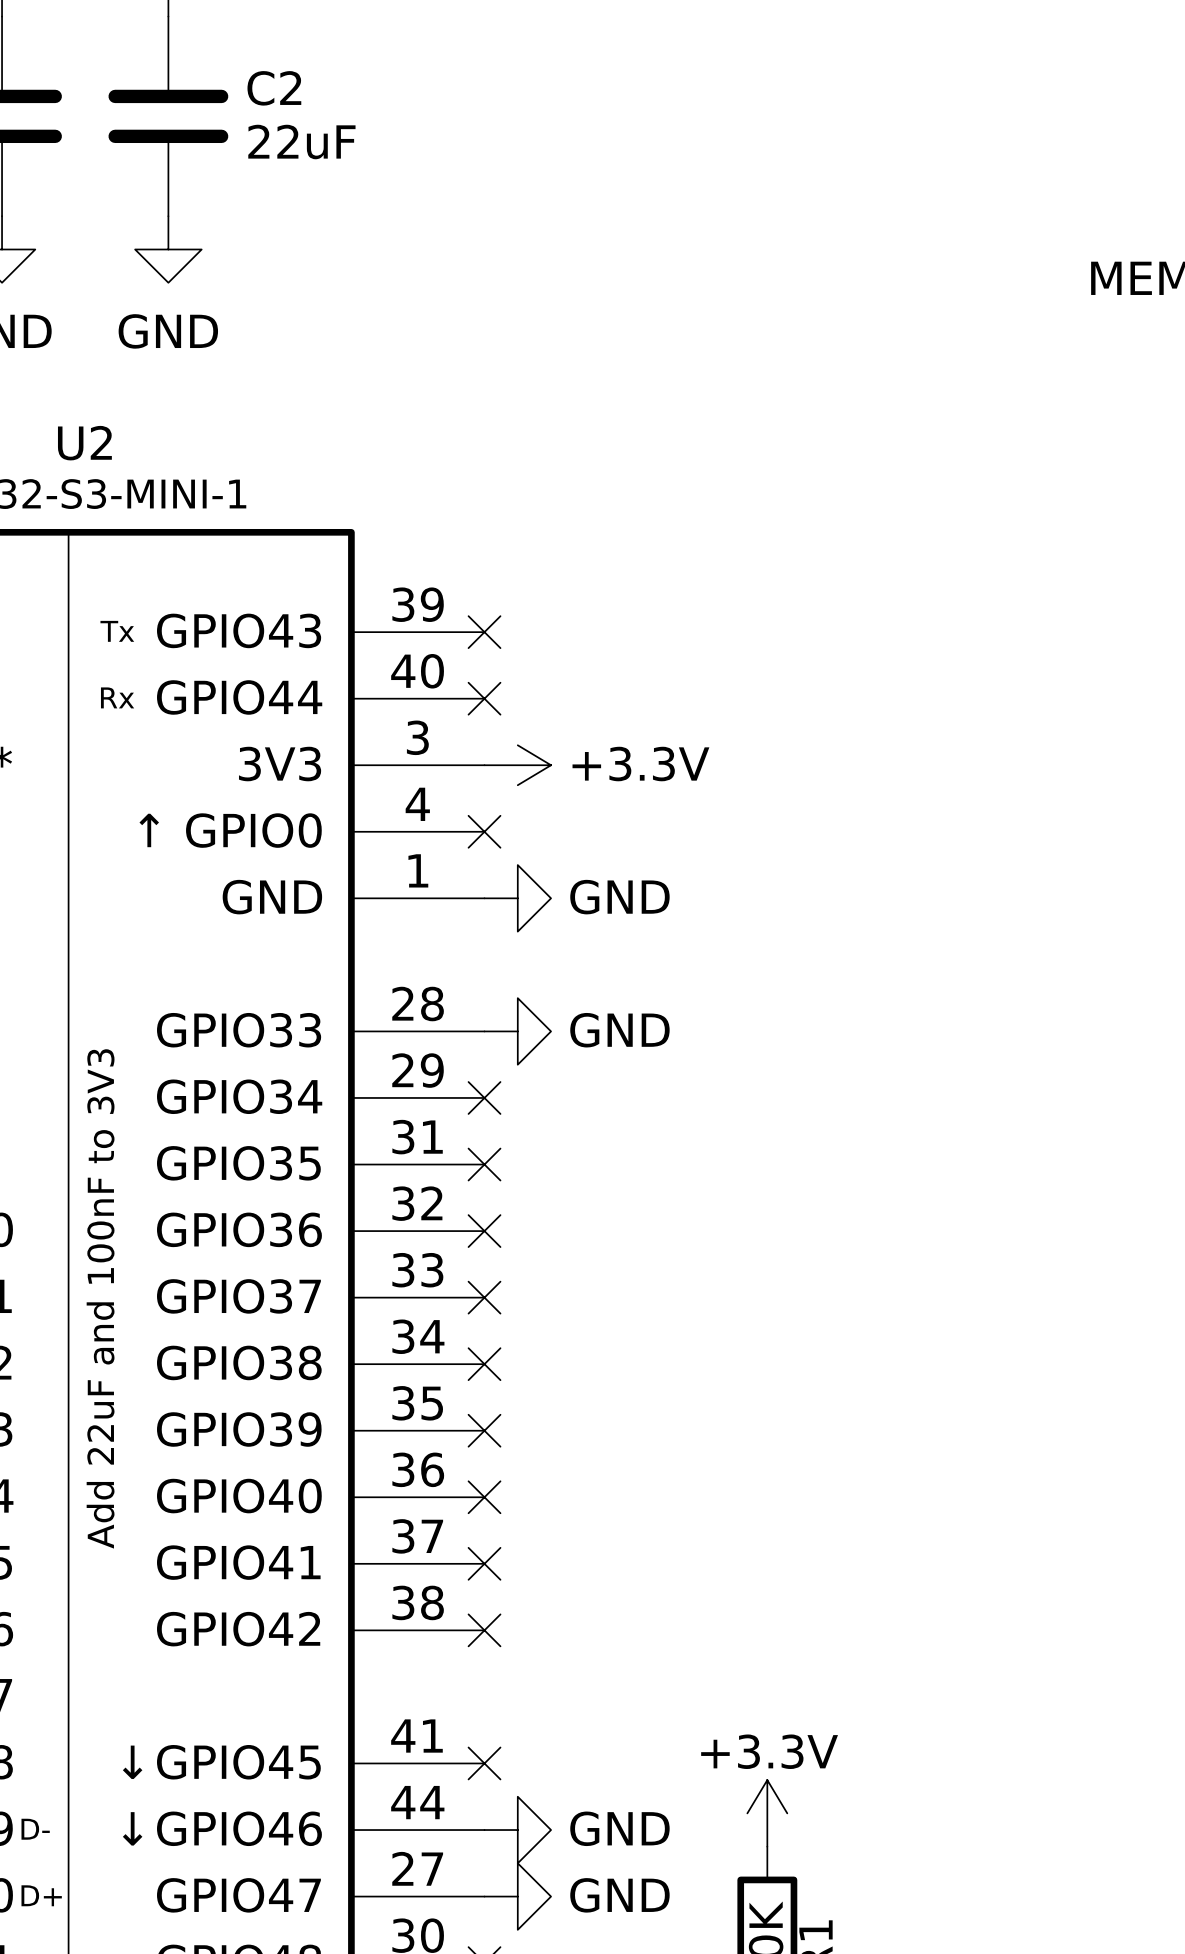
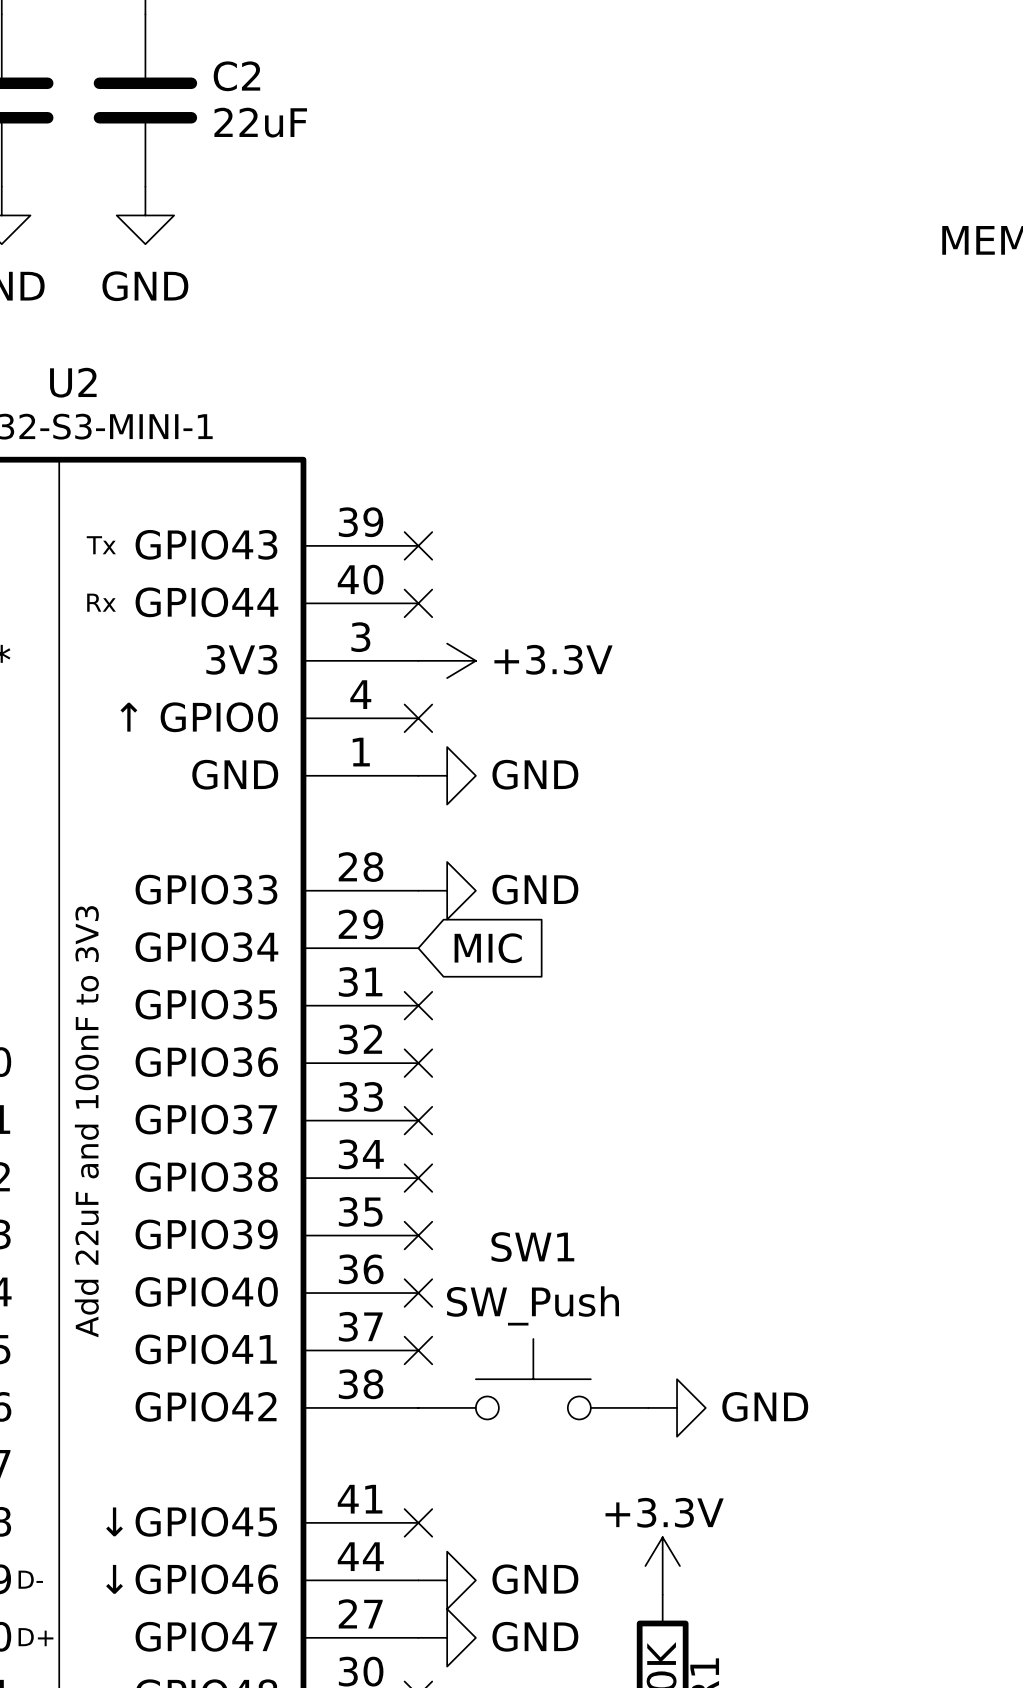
no-connect mark: (484, 1097) -> none
global label: none -> MIC (488, 948)
SW1: none -> SW_Push (533, 1379)
no-connect mark: (484, 1630) -> none
power symbol: none -> GND (677, 1407)

